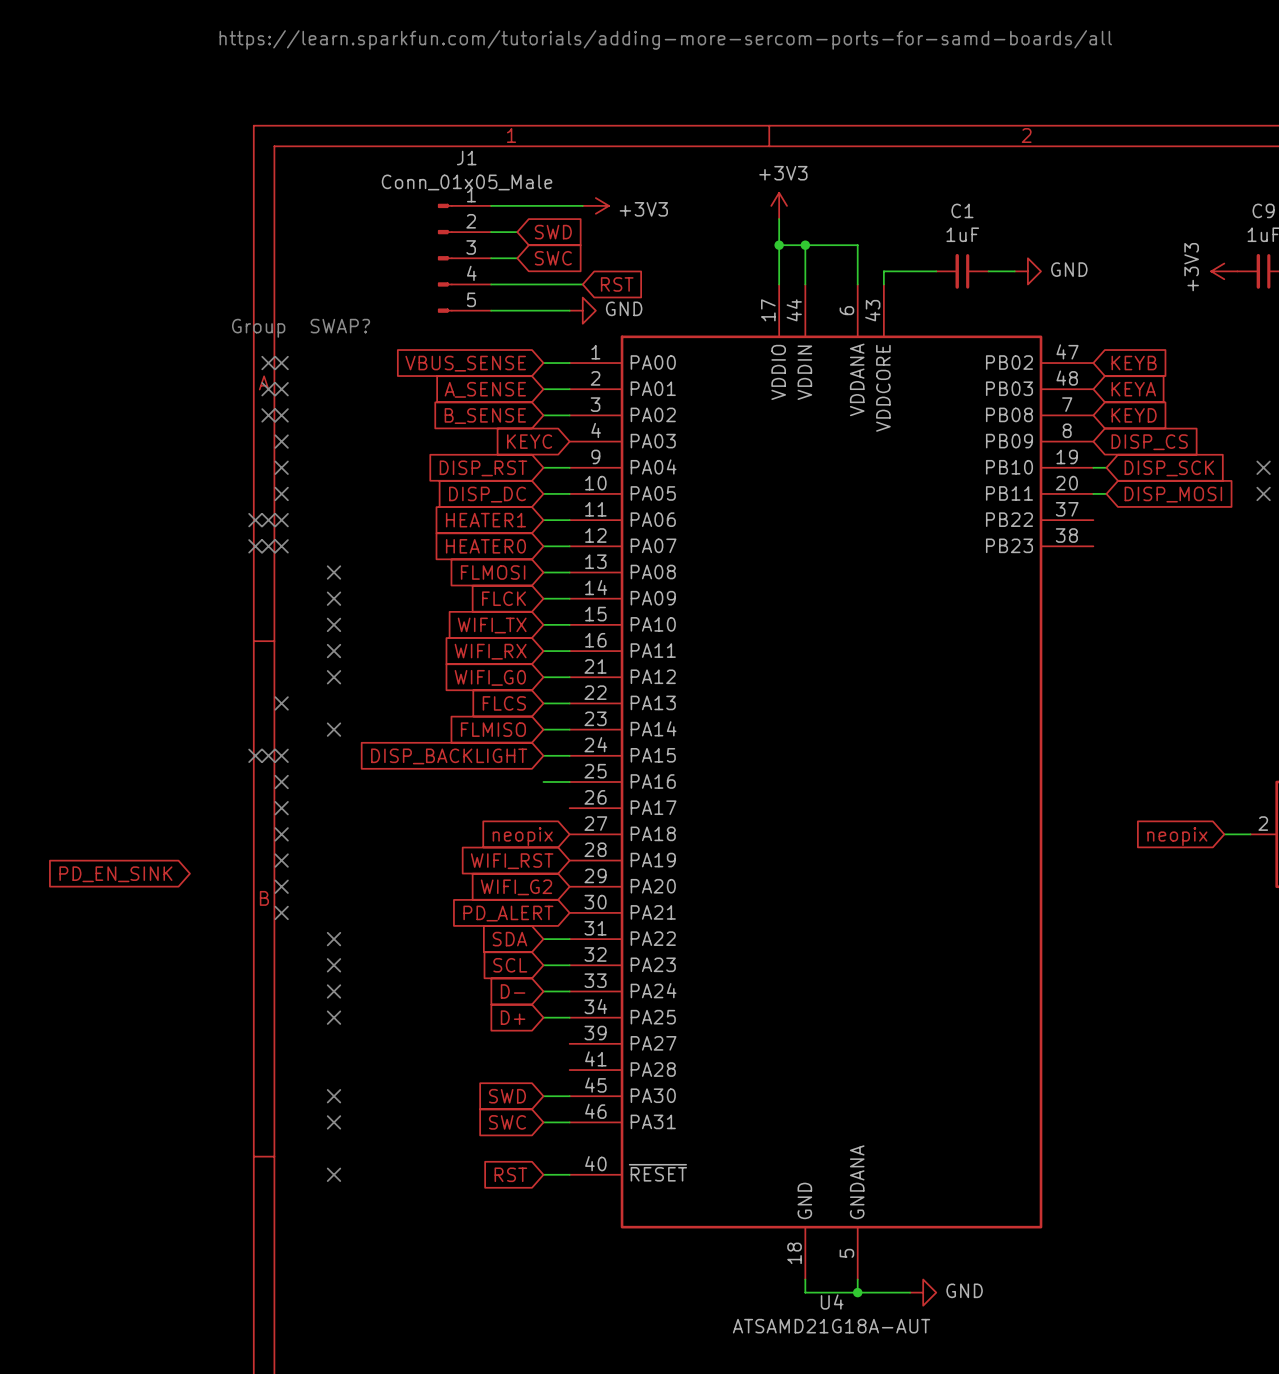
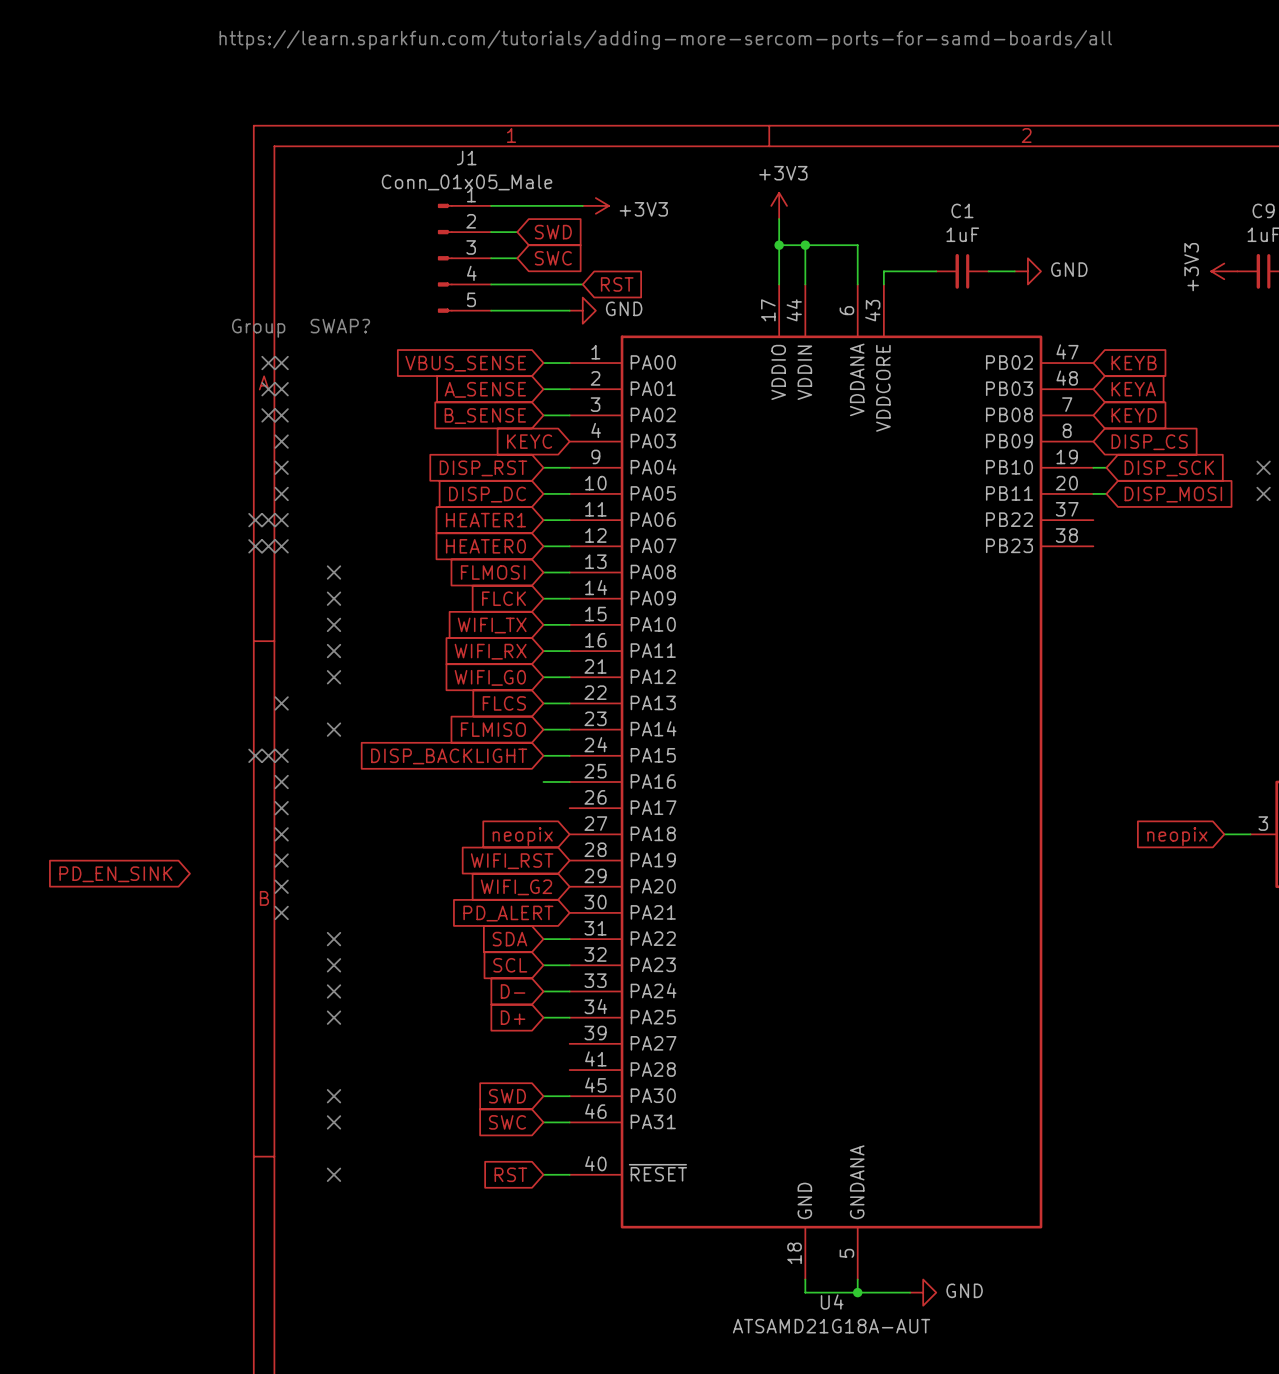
part pin number: 2 (1263, 823) -> 3 (1263, 823)

